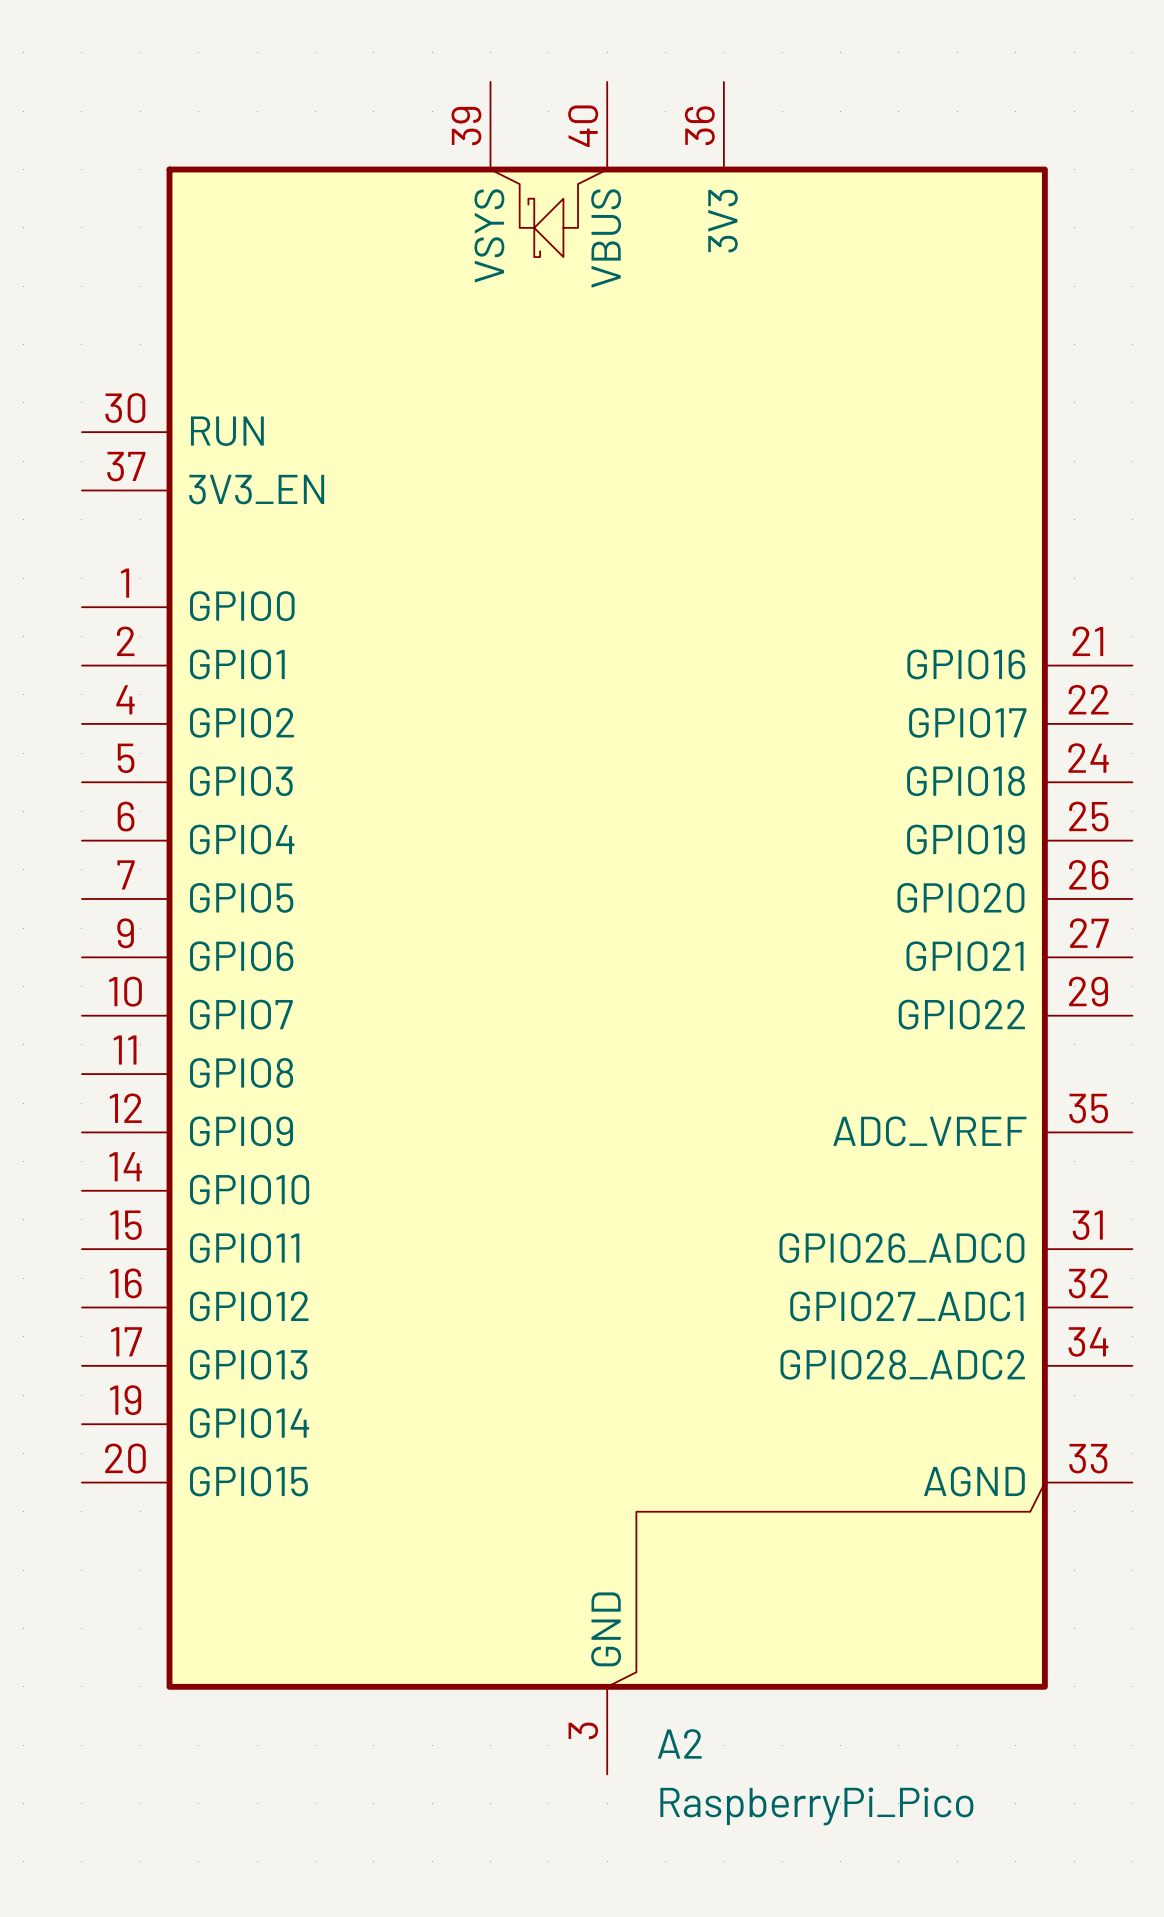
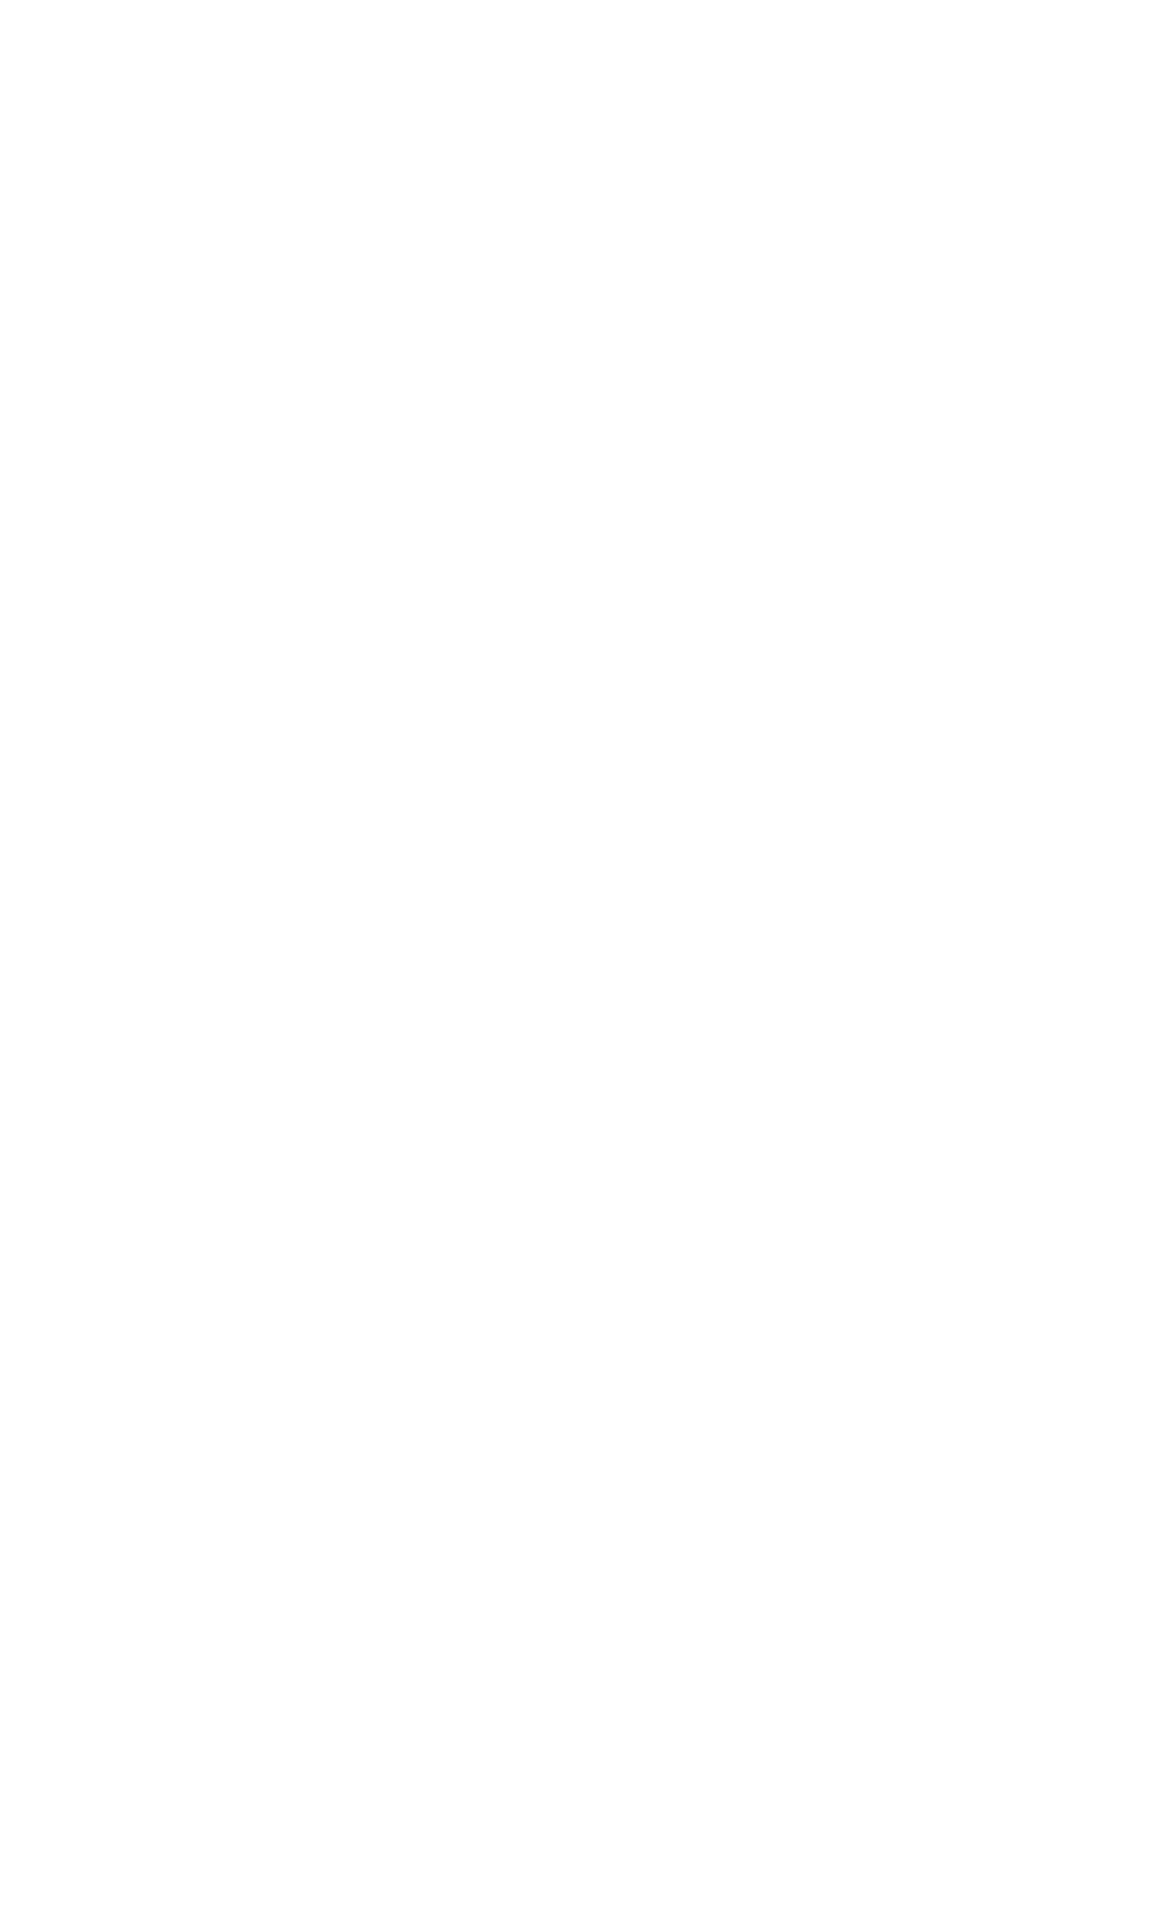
A2: RaspberryPi_Pico (607, 928) -> none

